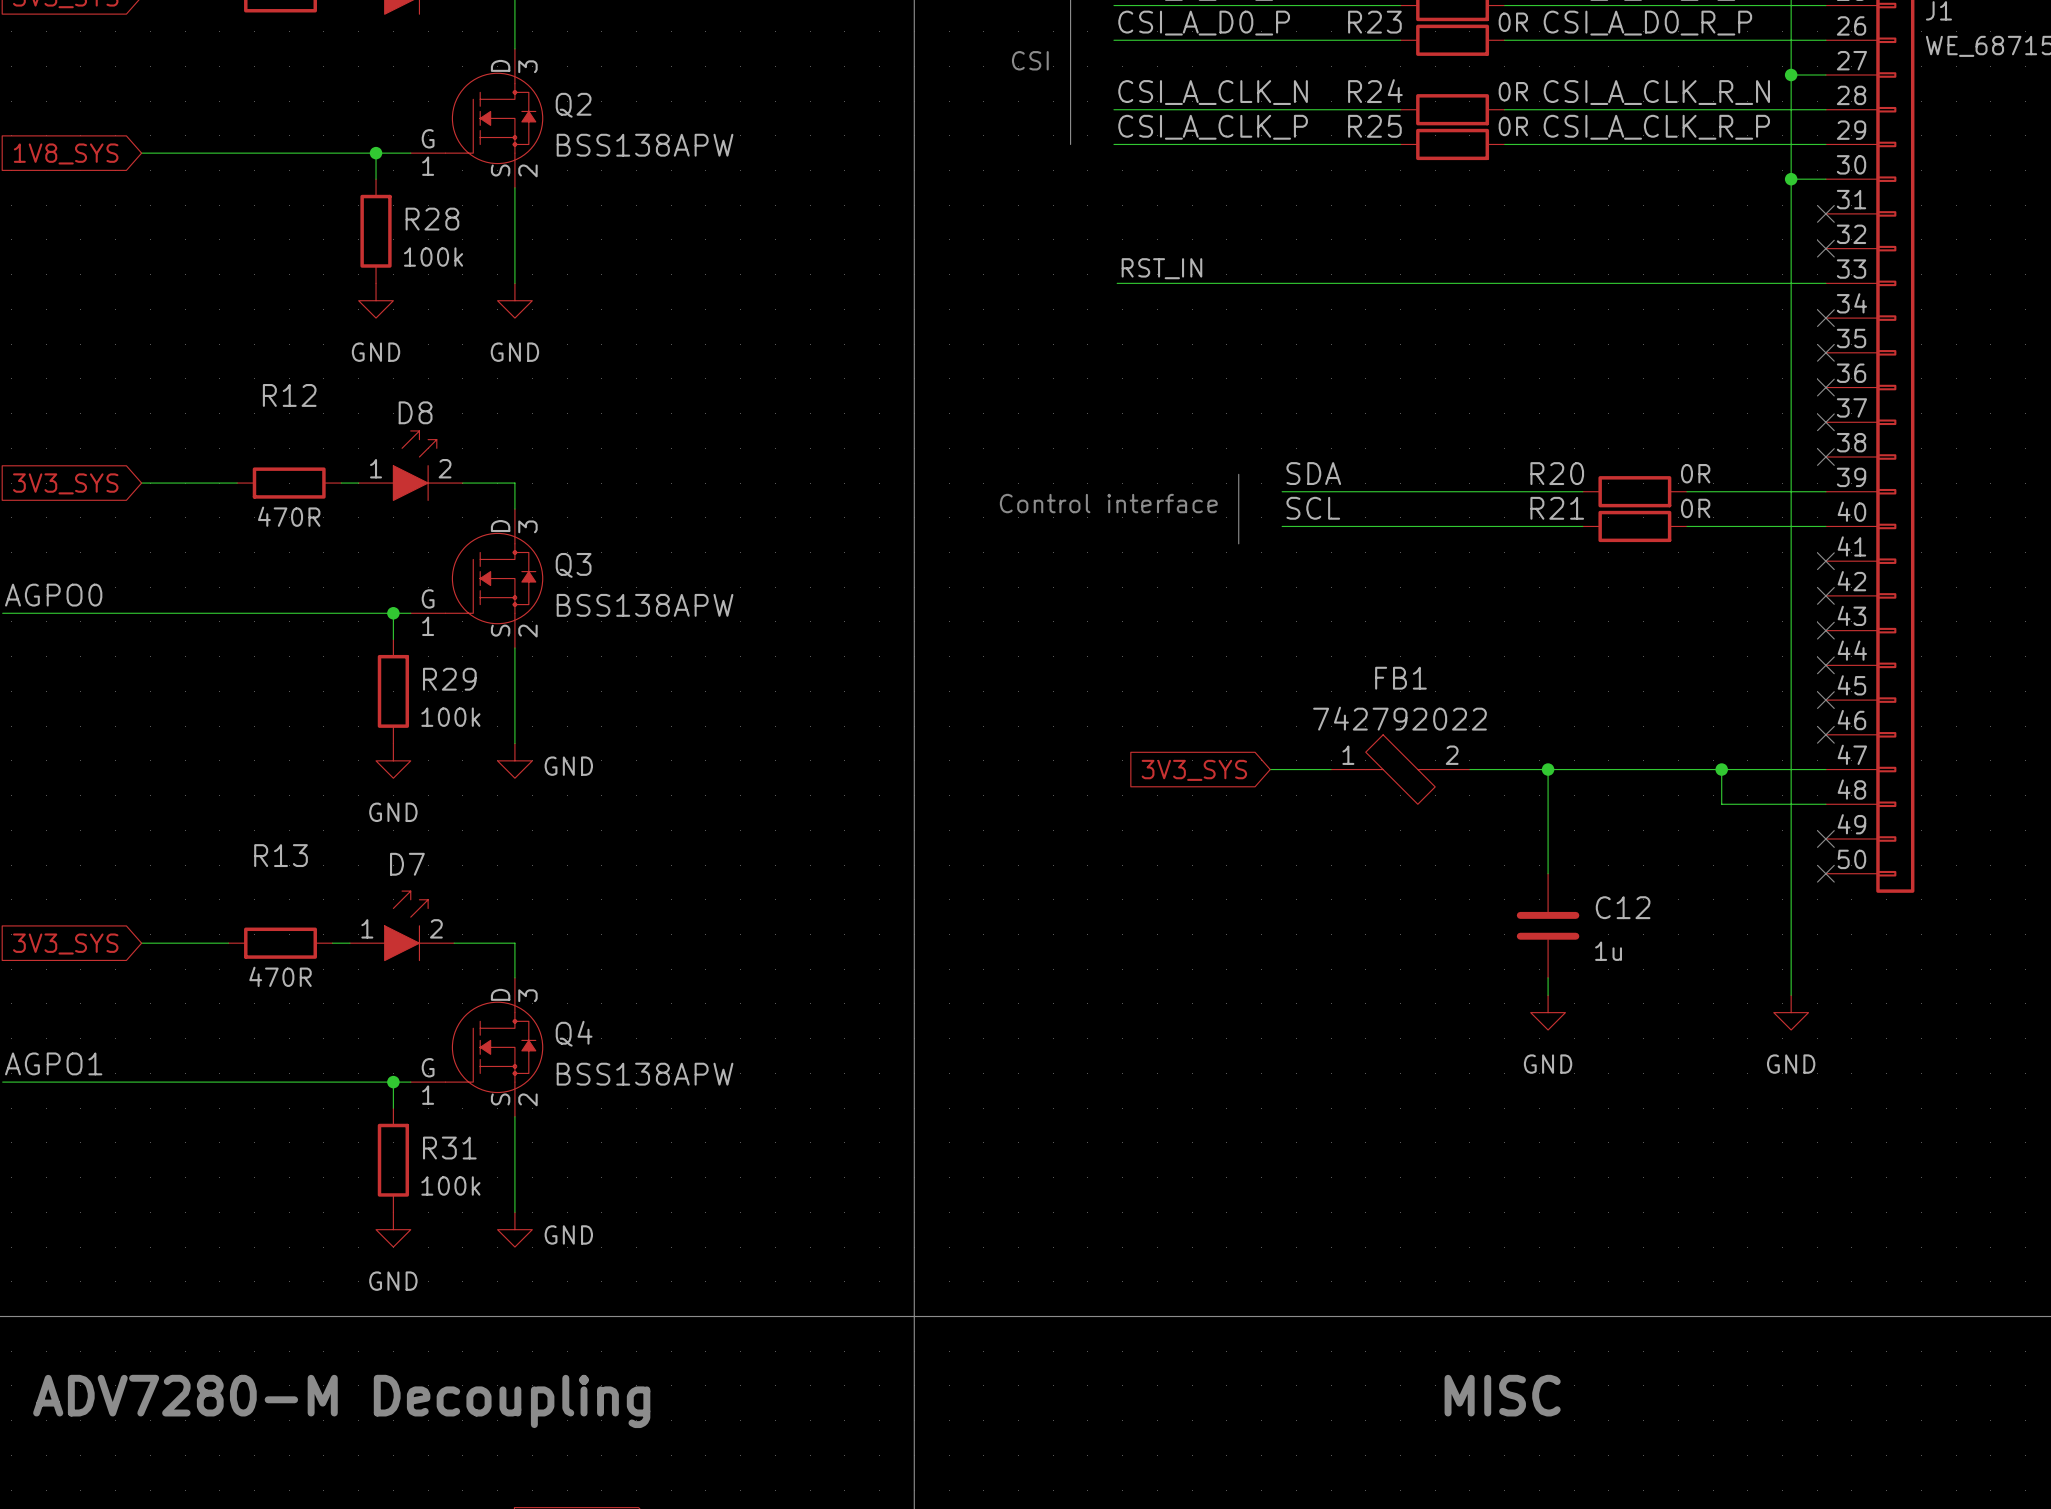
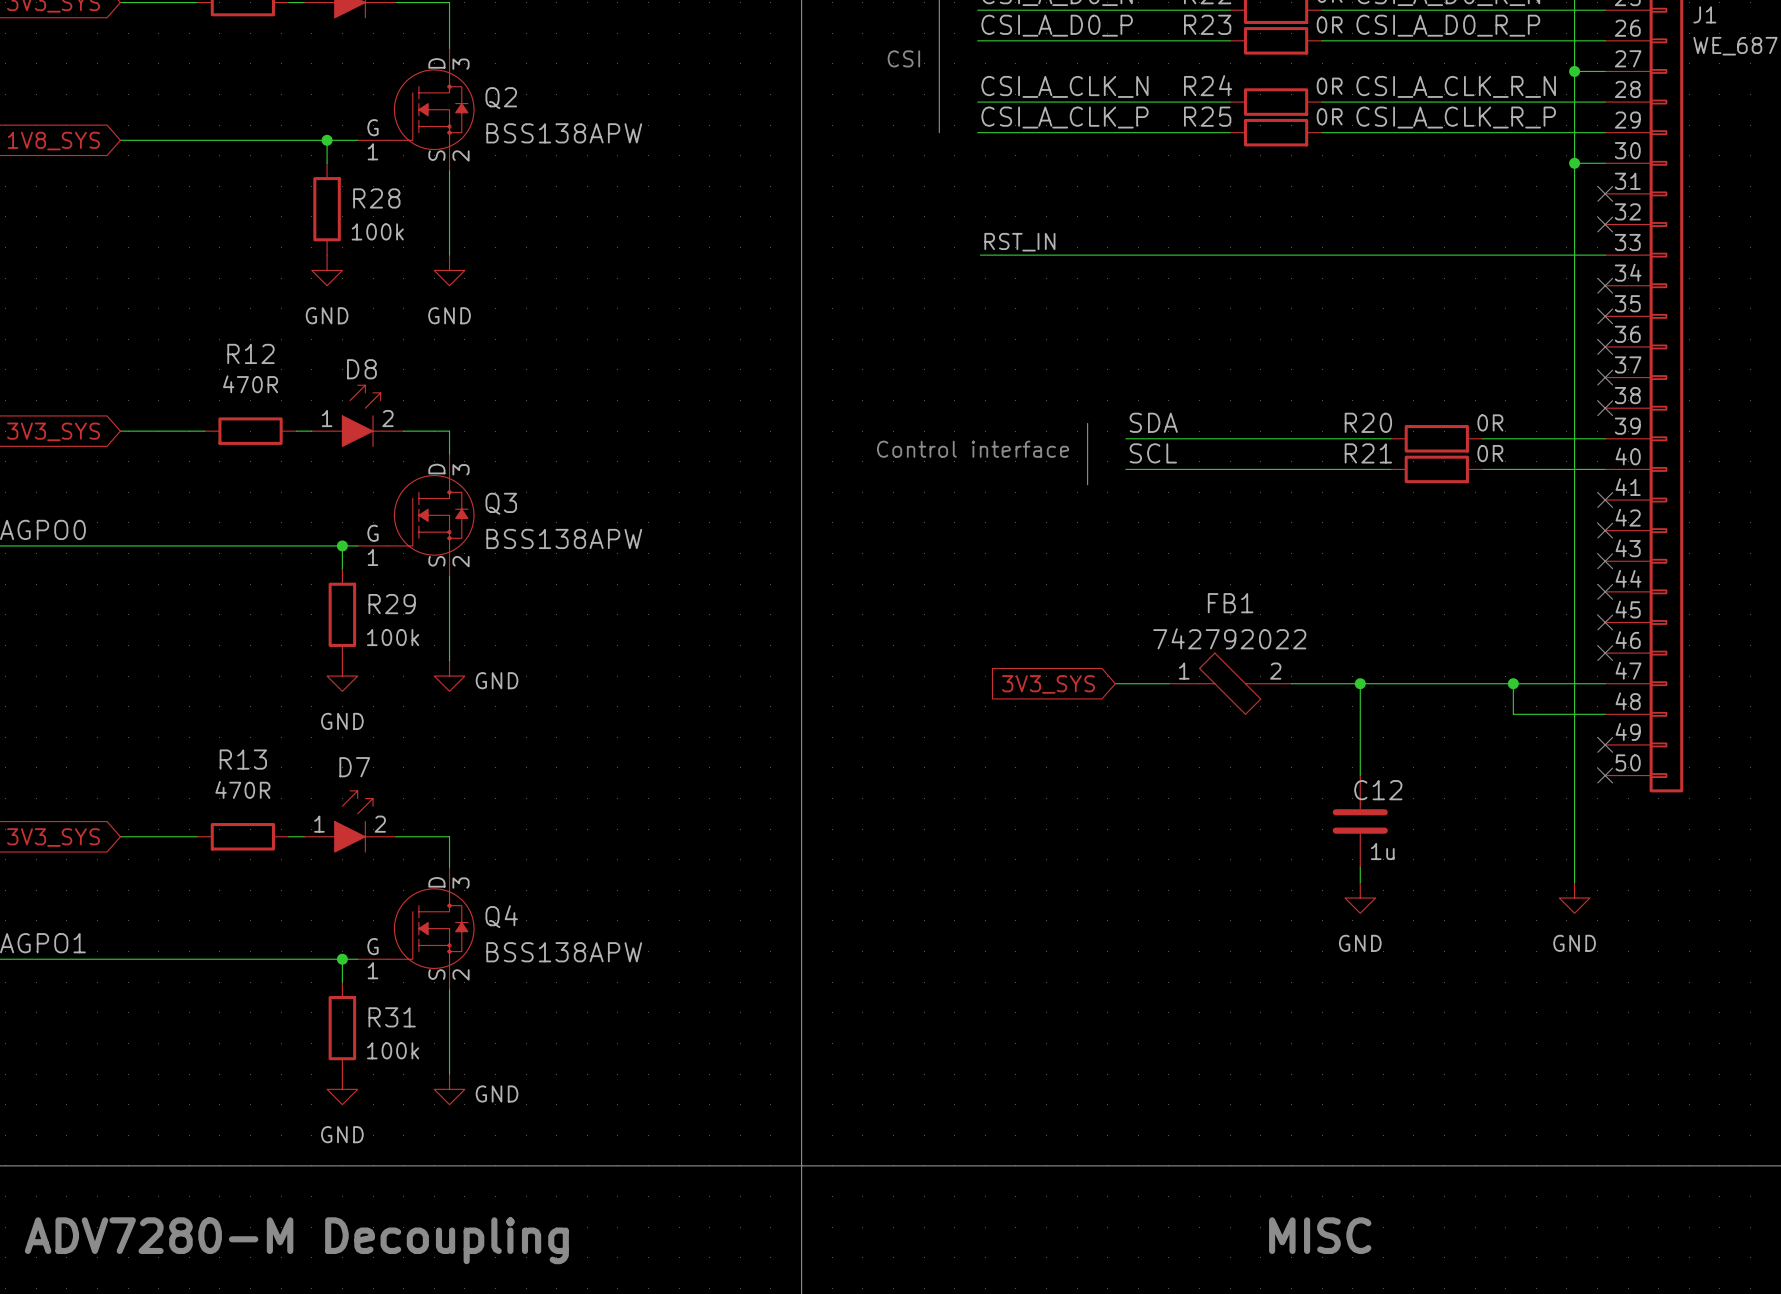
R12 text position: 470R (289, 516) -> 470R (250, 384)
C12 name position: C12 (1623, 907) -> C12 (1378, 790)
C12 text position: 1u (1608, 951) -> 1u (1382, 851)
R13 text position: 470R (280, 976) -> 470R (242, 789)

